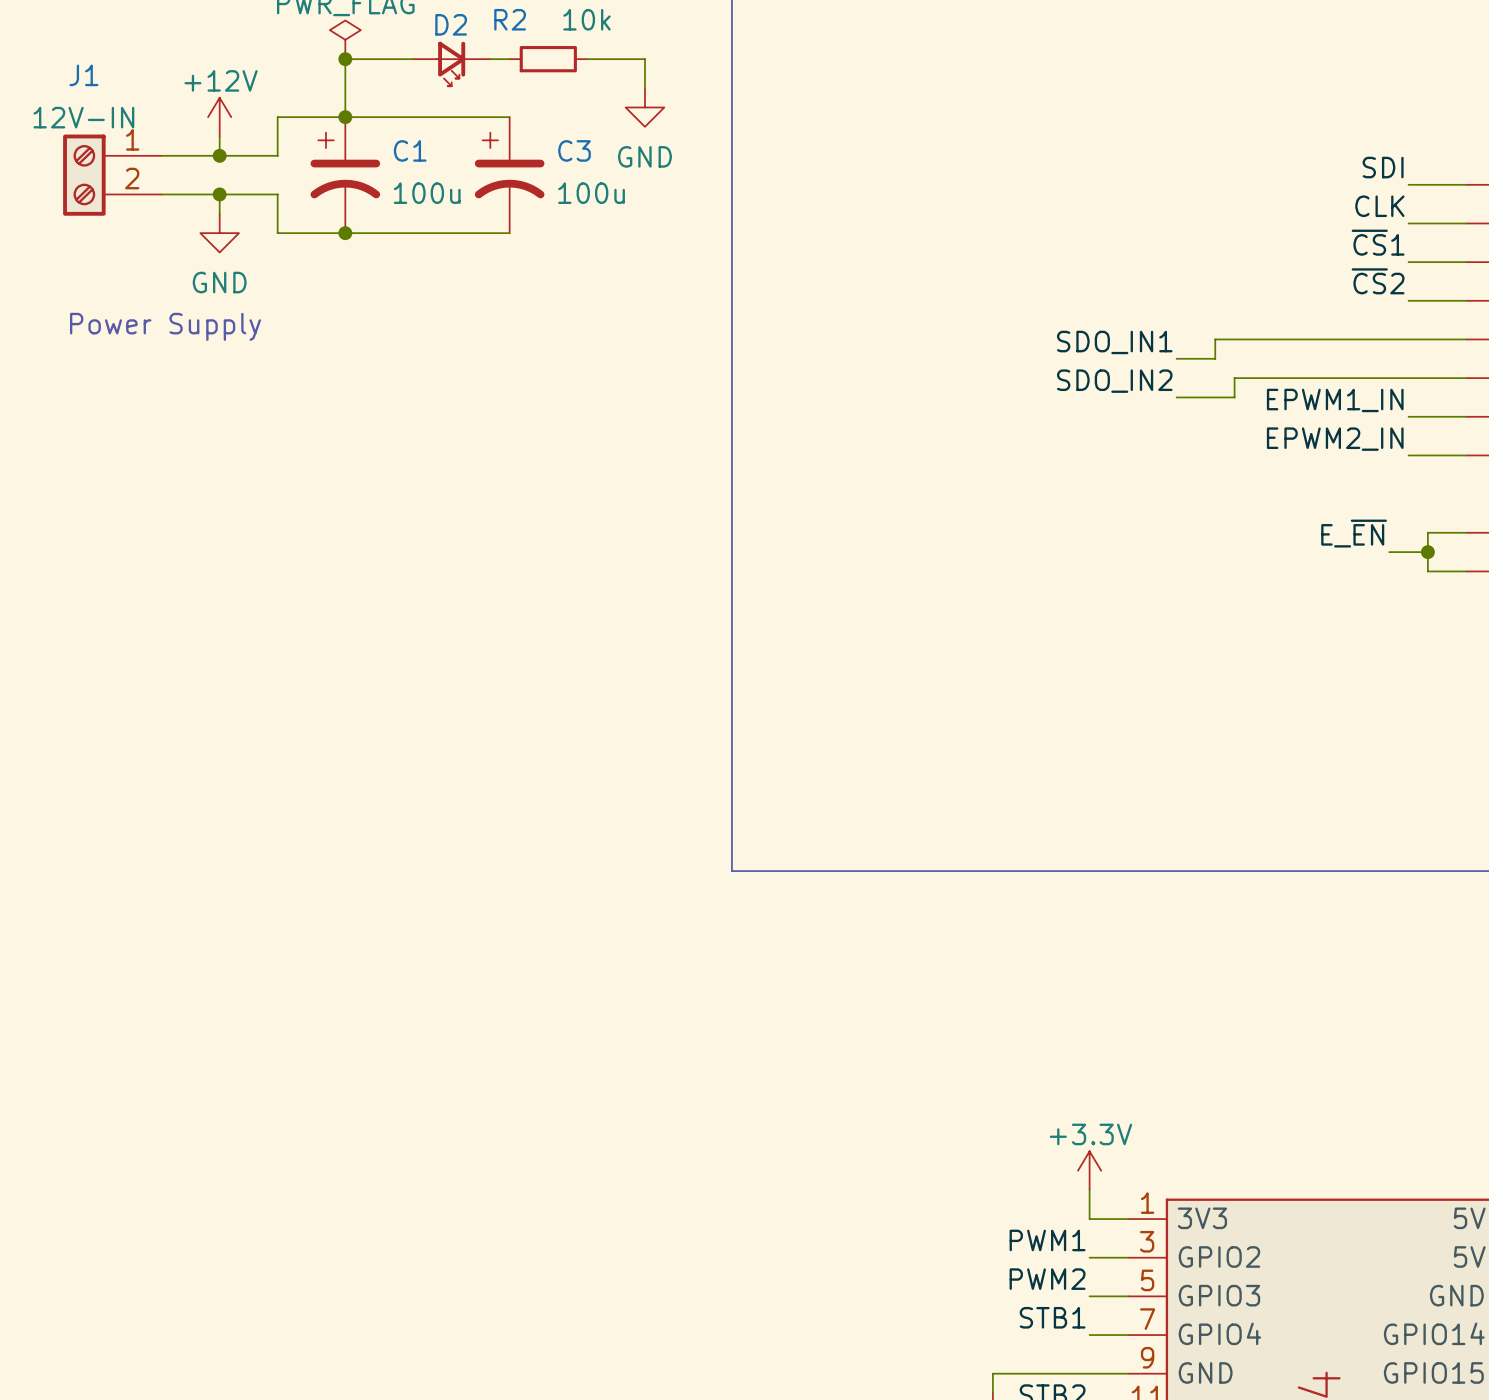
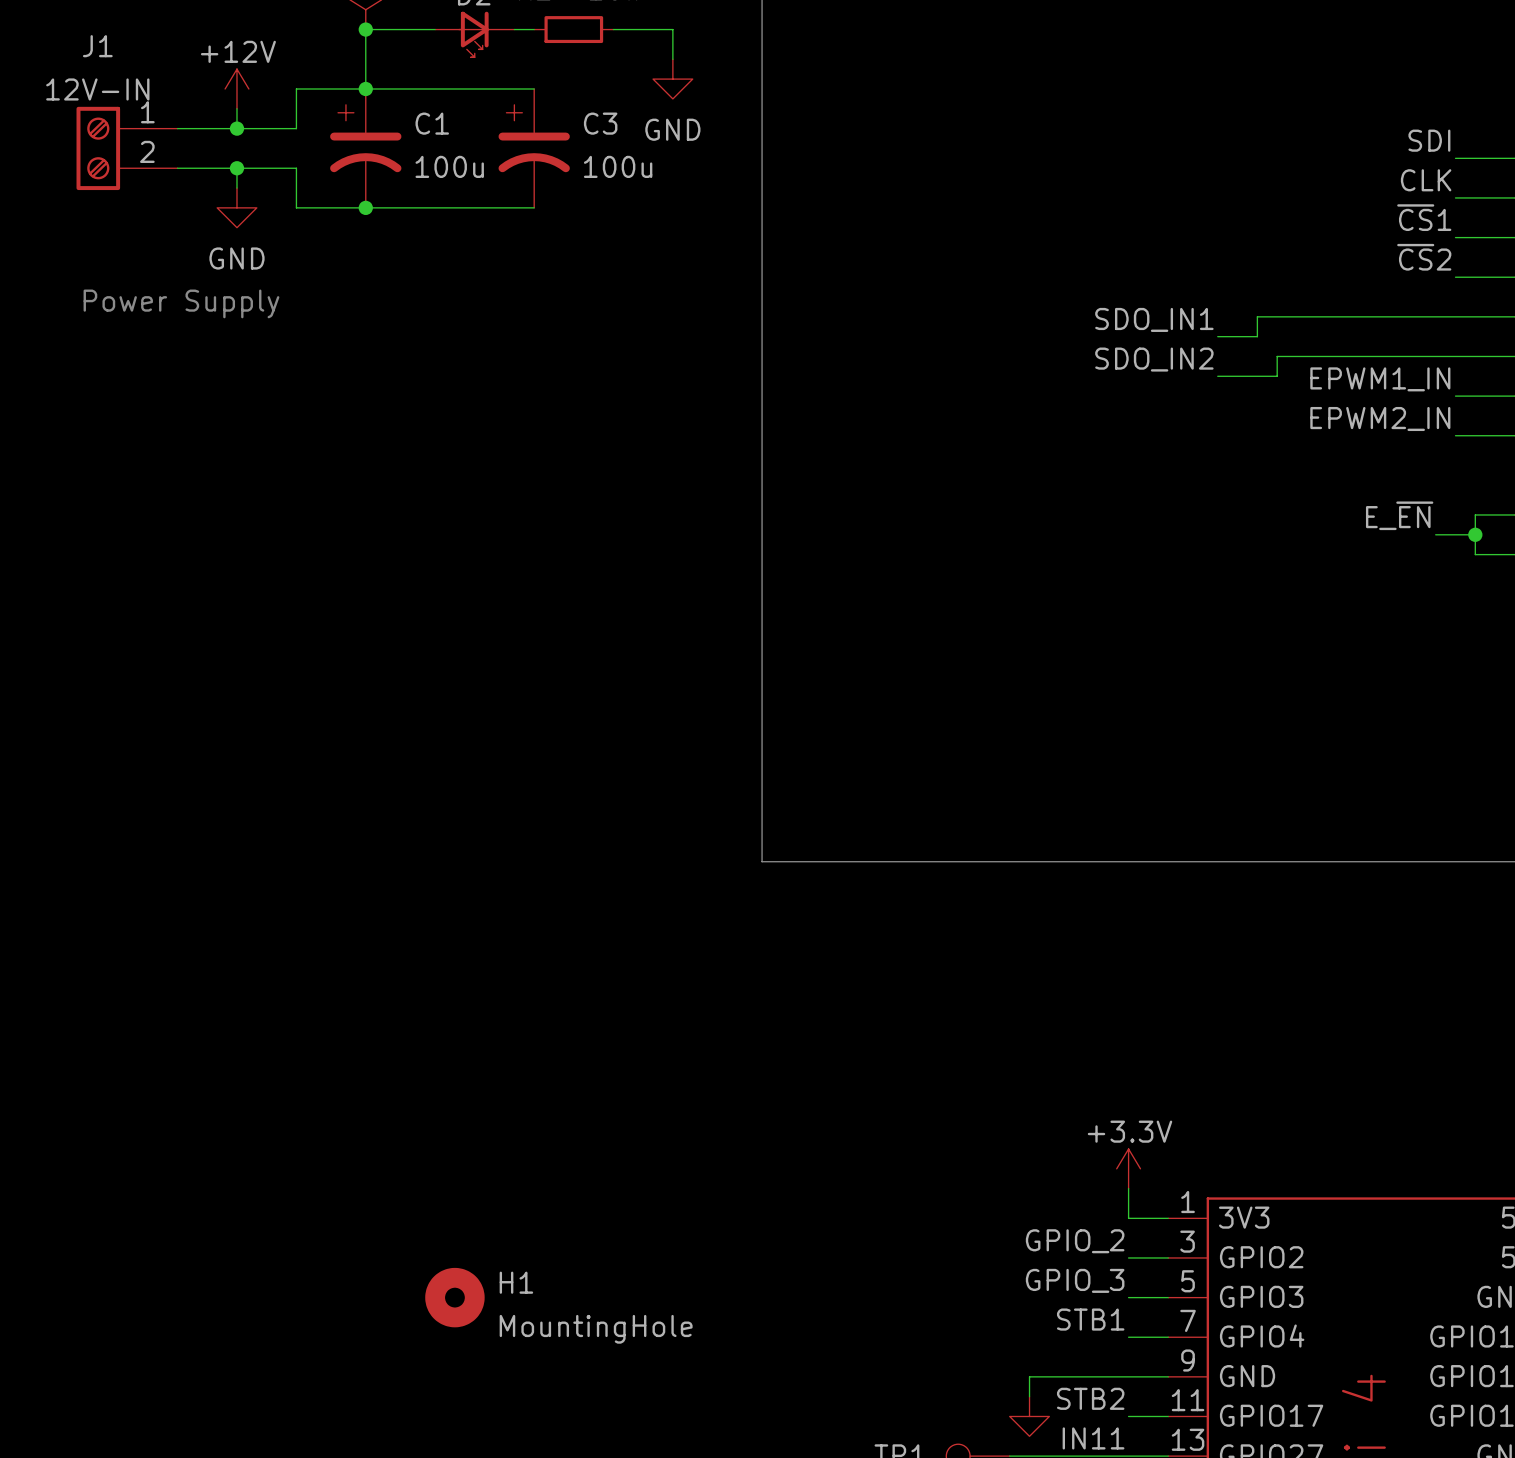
label: PWM1 (1047, 1240) -> GPIO_2 (1075, 1241)
label: PWM2 (1047, 1279) -> GPIO_3 (1075, 1280)
H1: none -> MountingHole (454, 1297)

